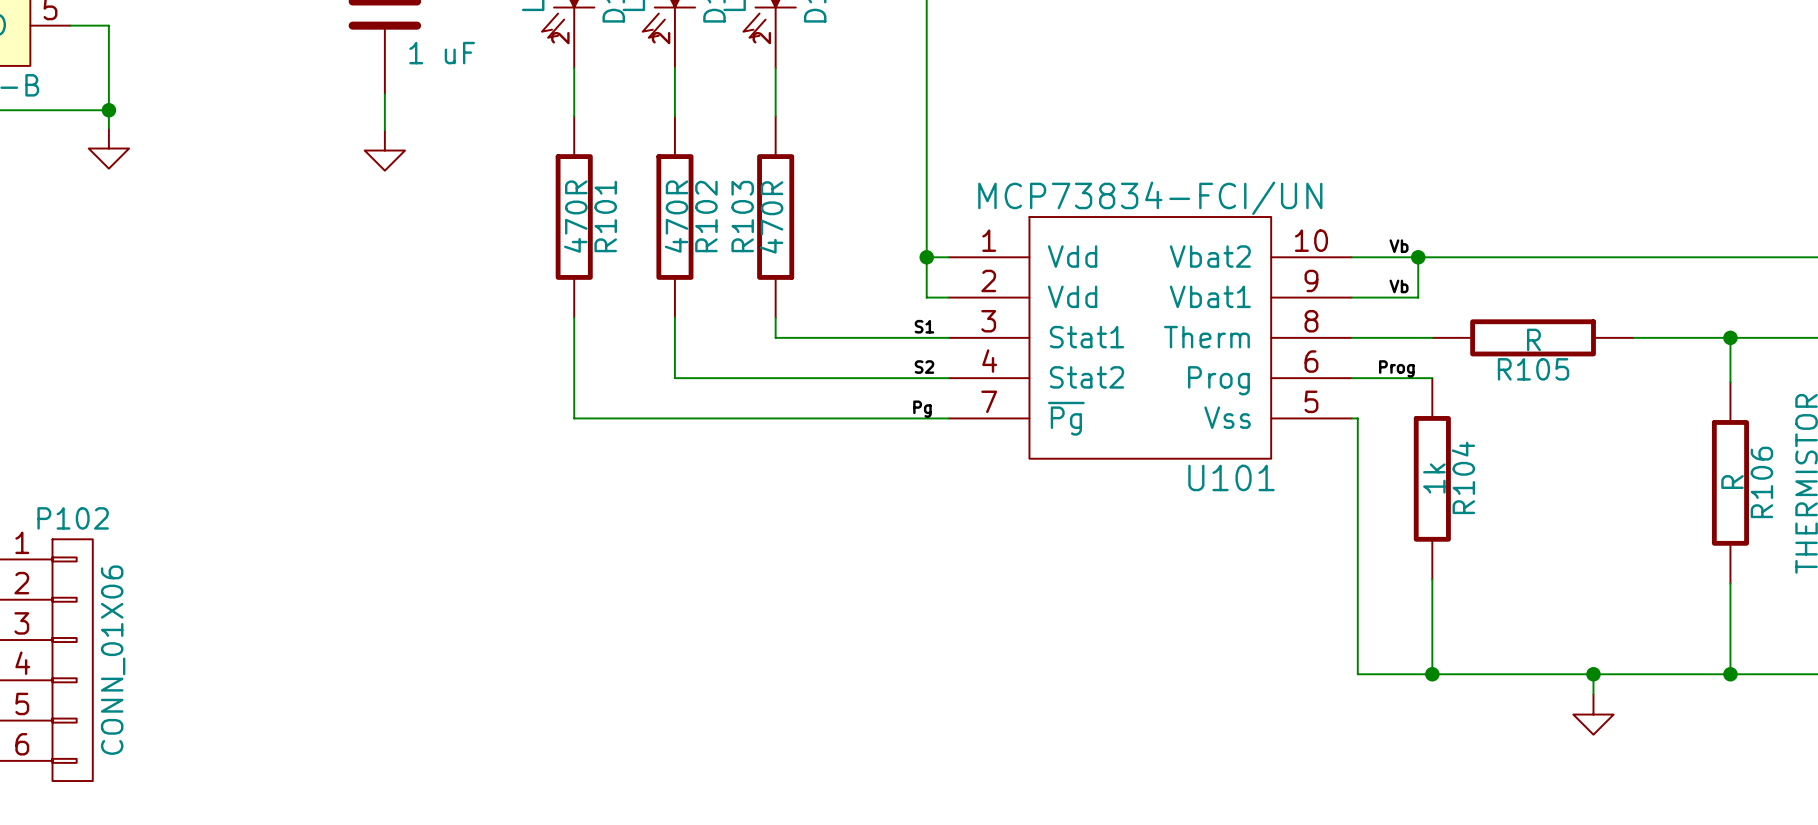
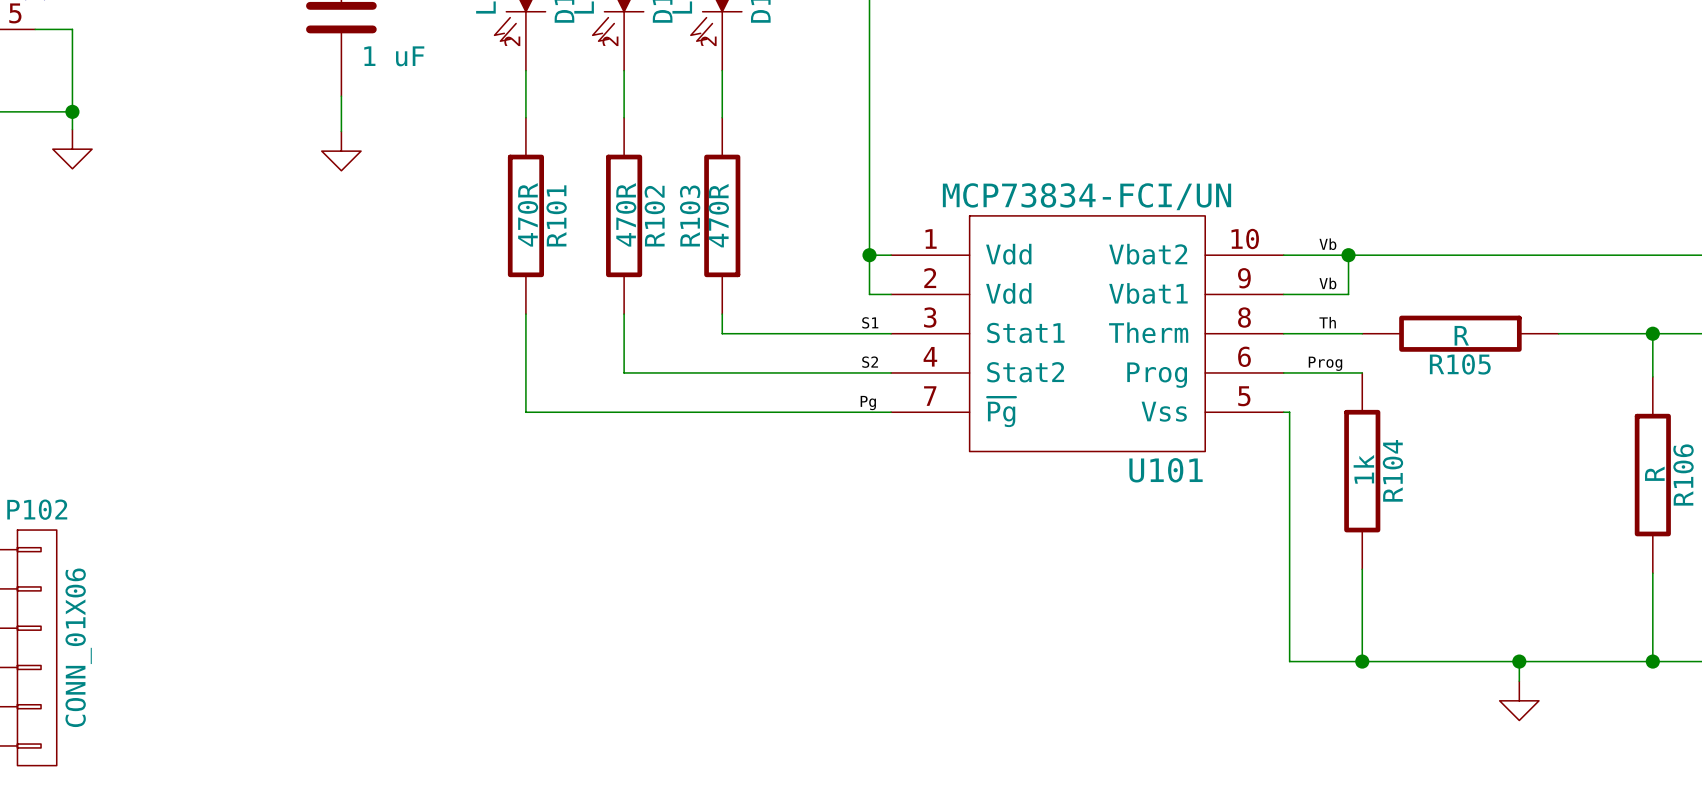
label: none -> Th (1327, 322)

